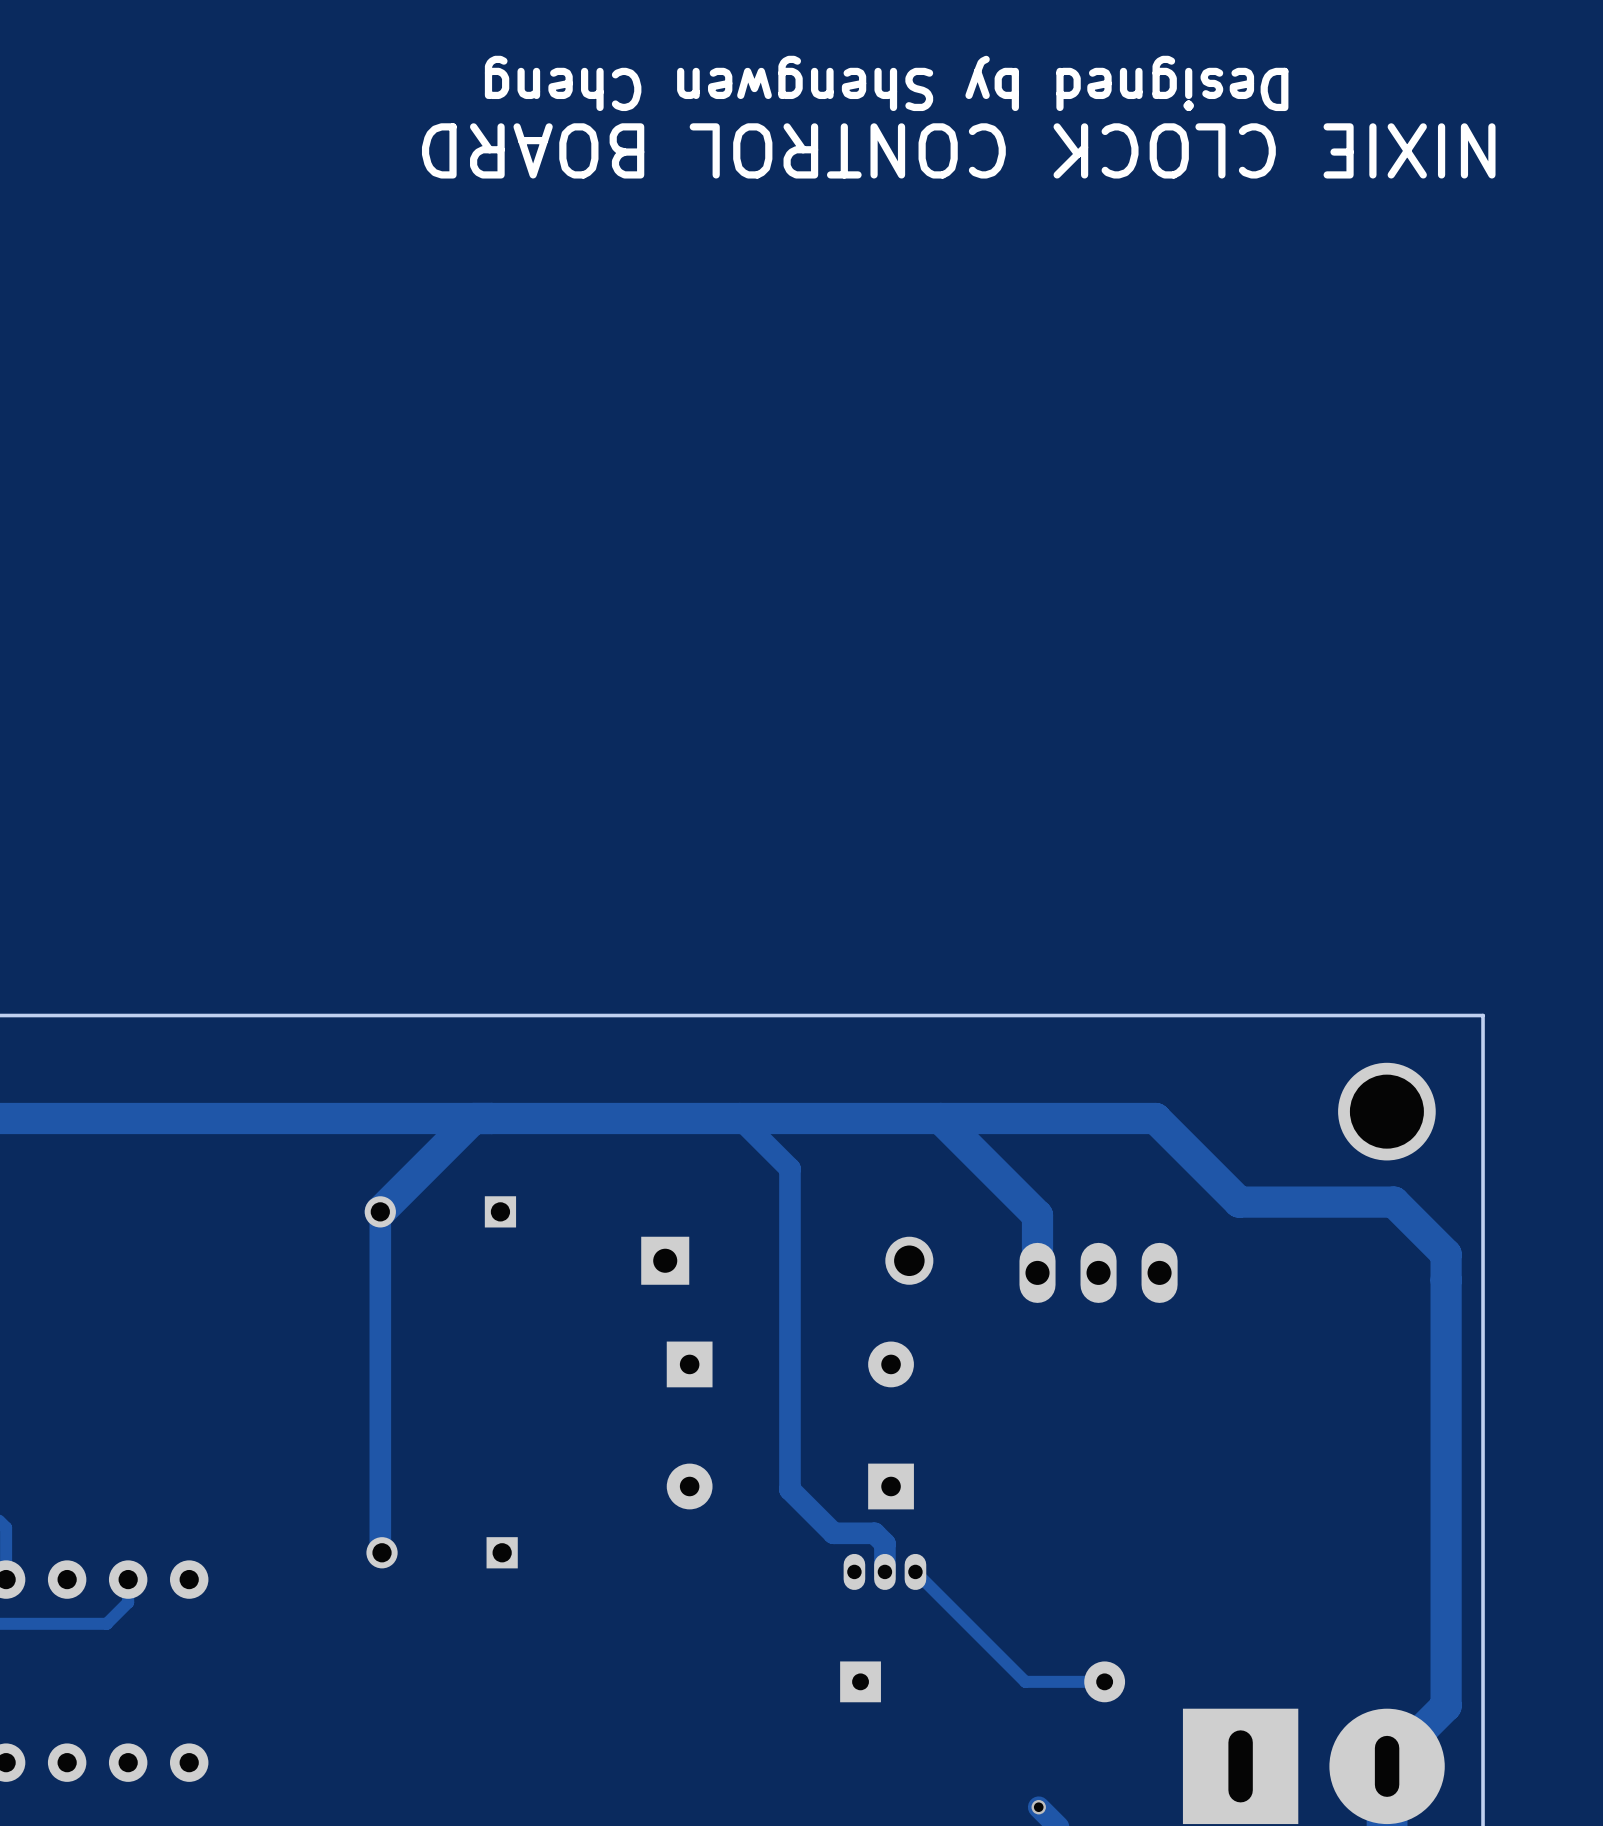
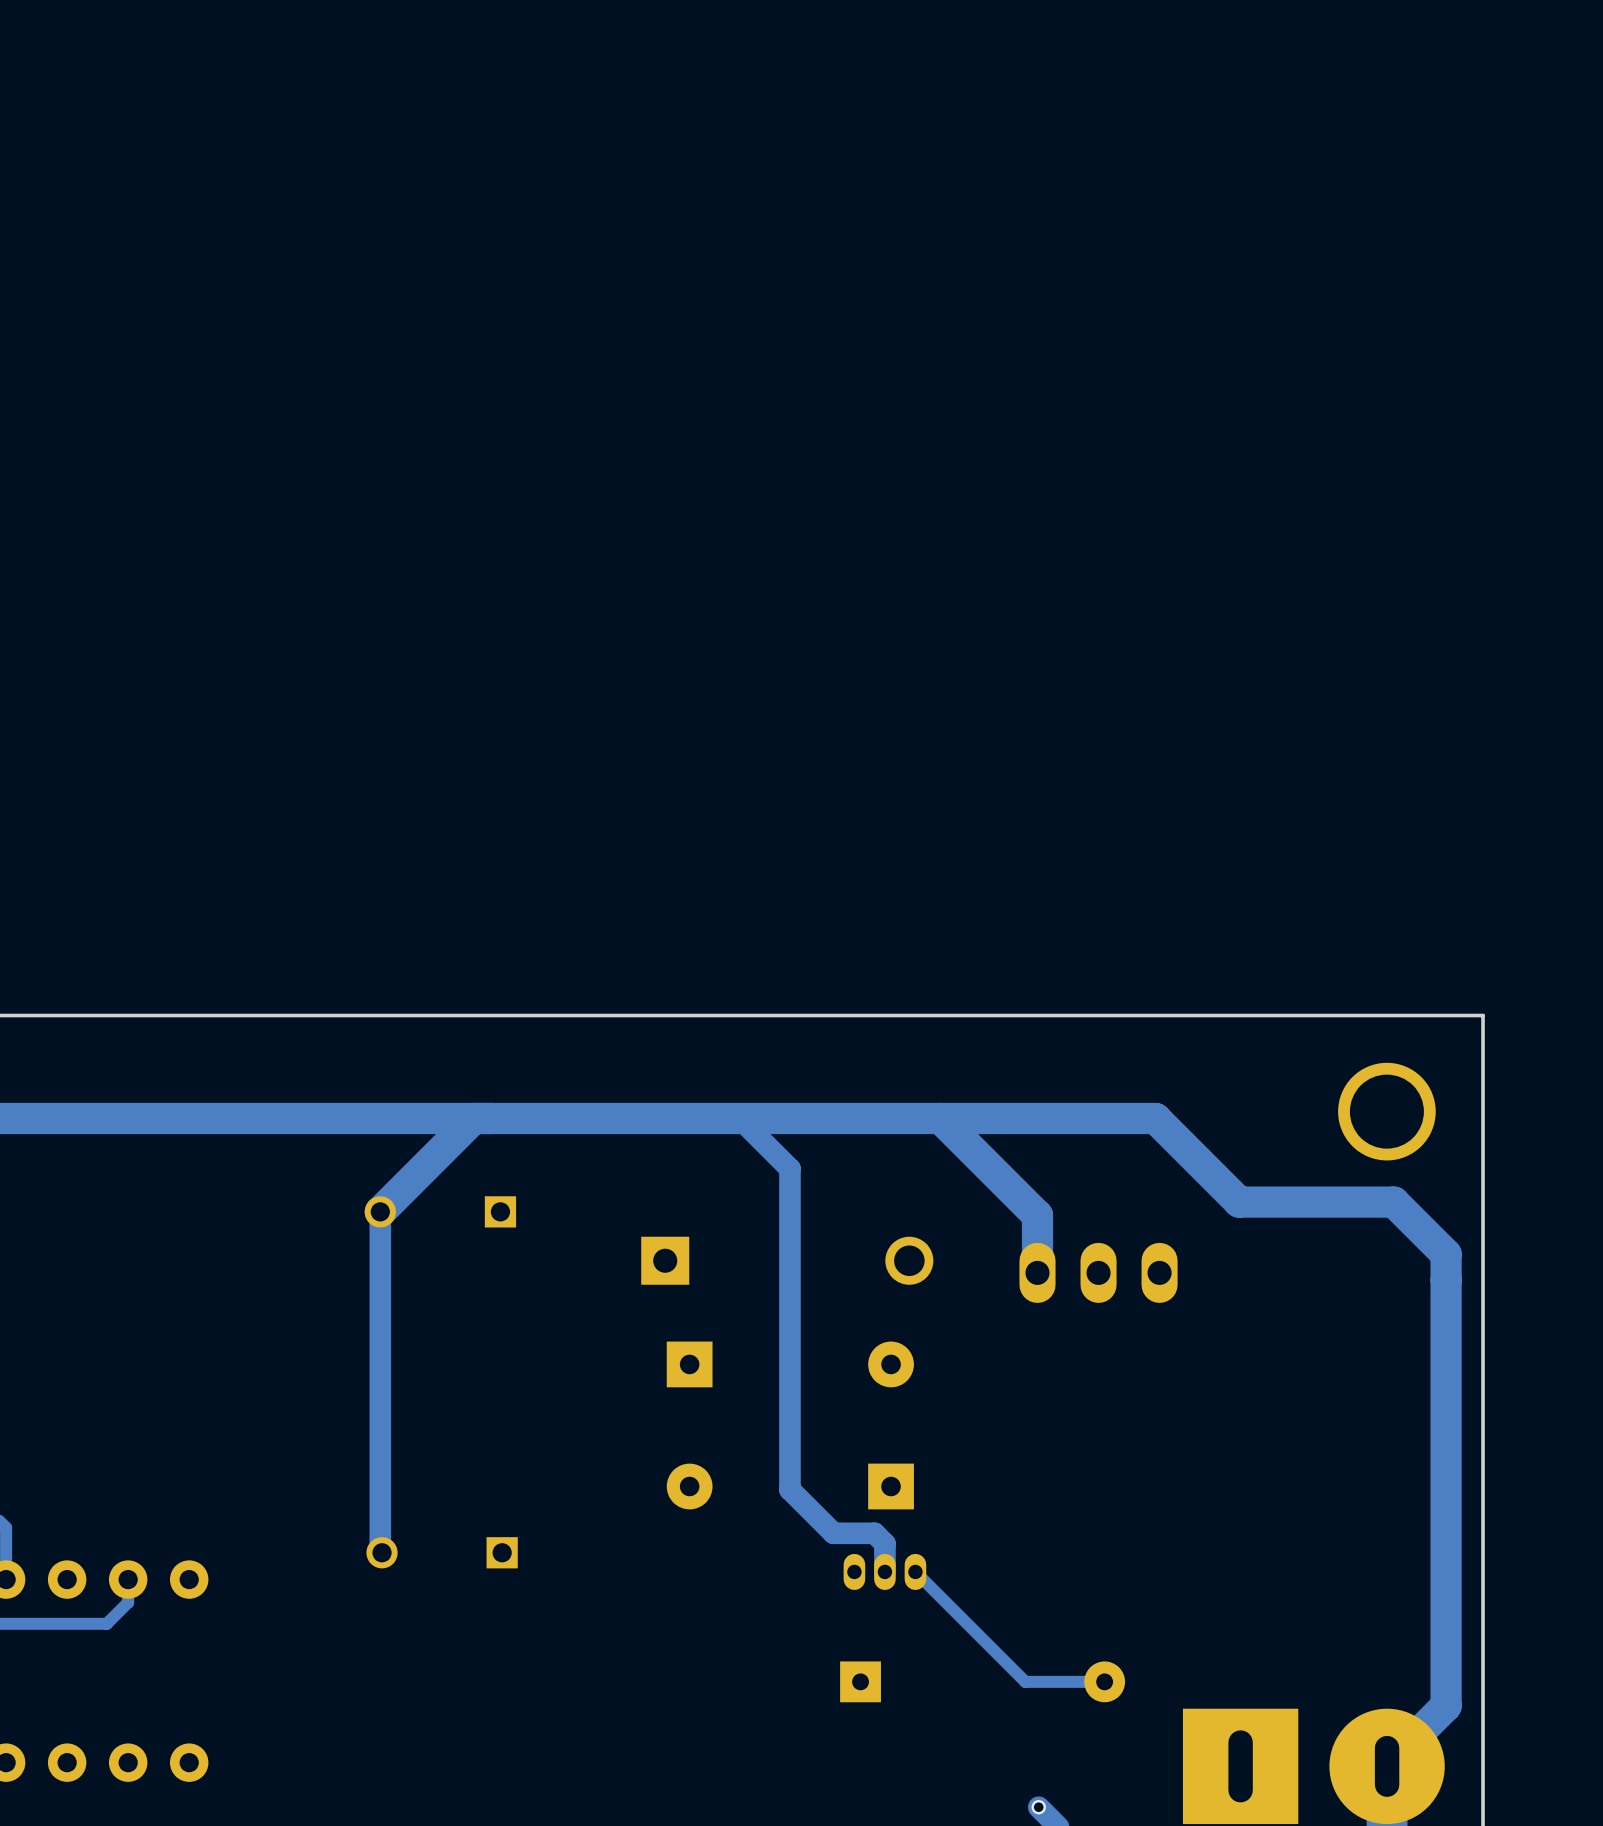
text: Designed by Shengwen Cheng (886, 83) -> none
text: NIXIE CLOCK CONTROL BOARD (958, 150) -> none

